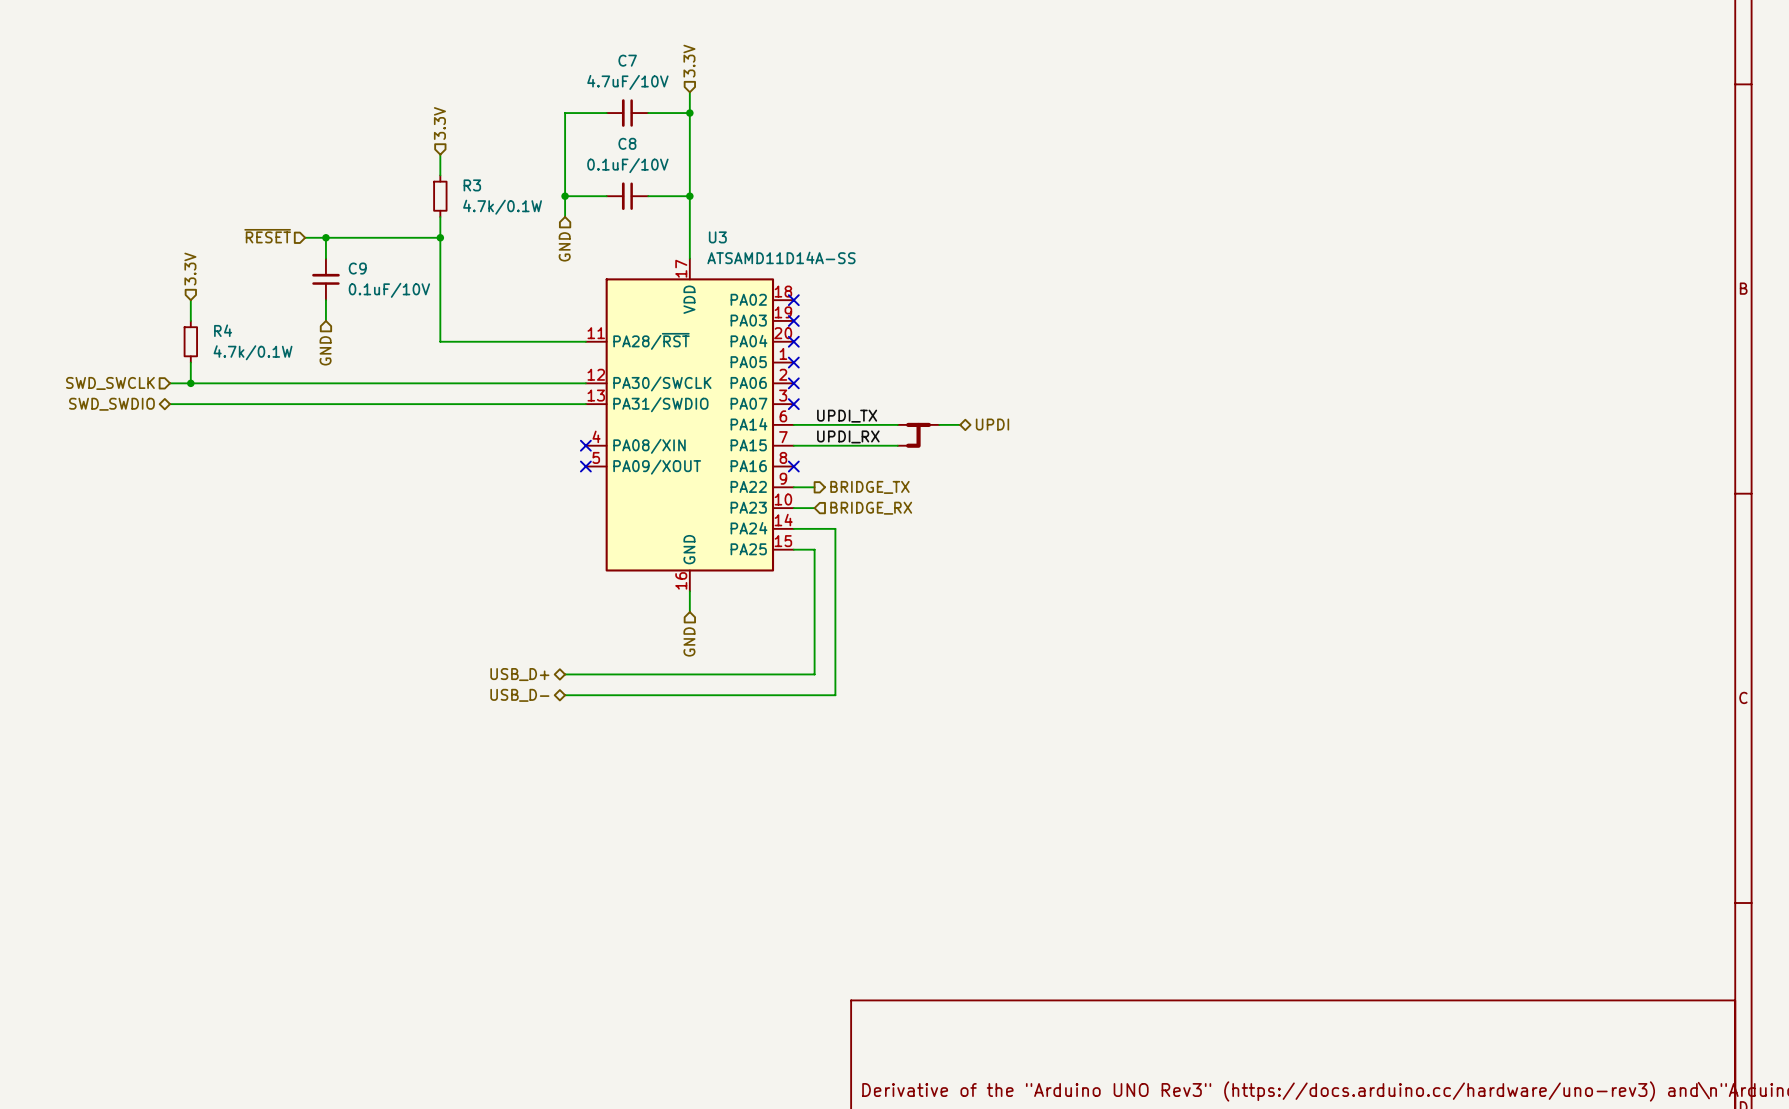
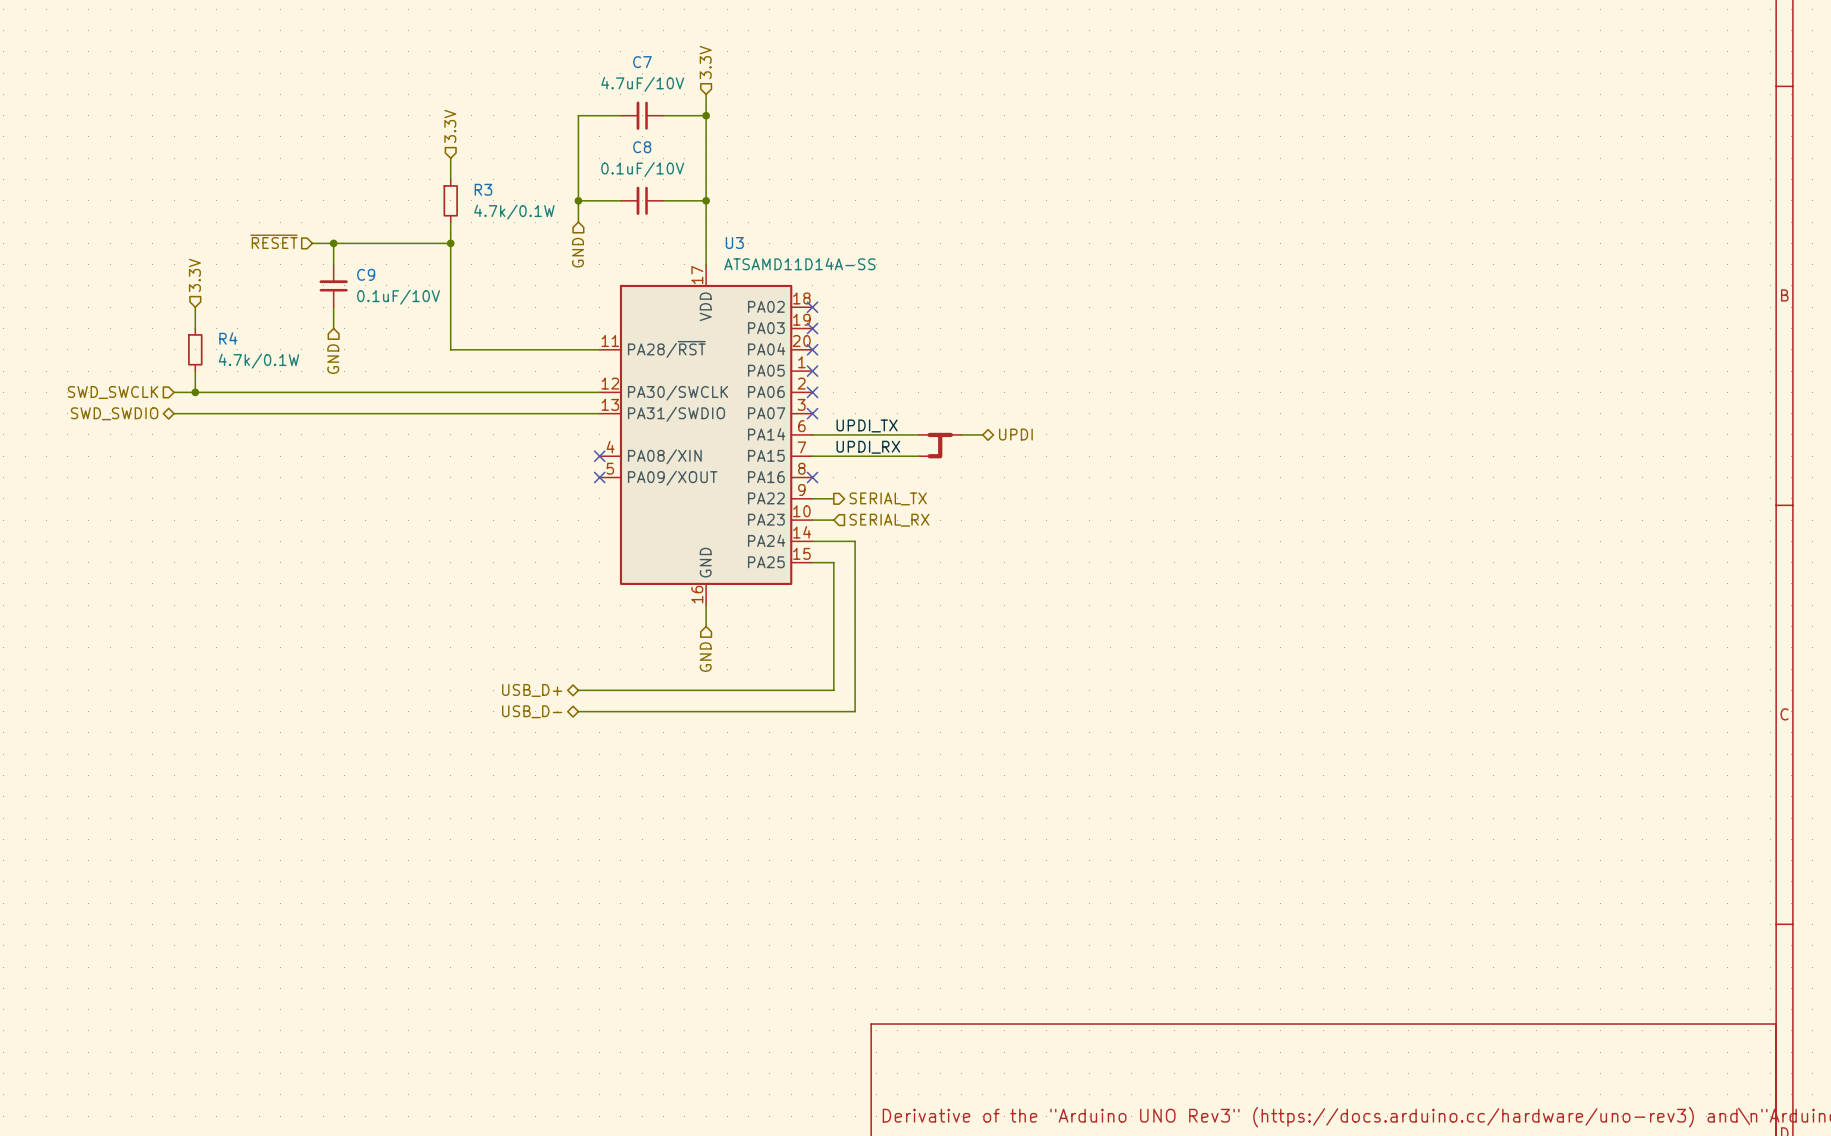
hierarchical label: BRIDGE_TX (869, 487) -> SERIAL_TX (888, 498)
hierarchical label: BRIDGE_RX (871, 508) -> SERIAL_RX (889, 520)

